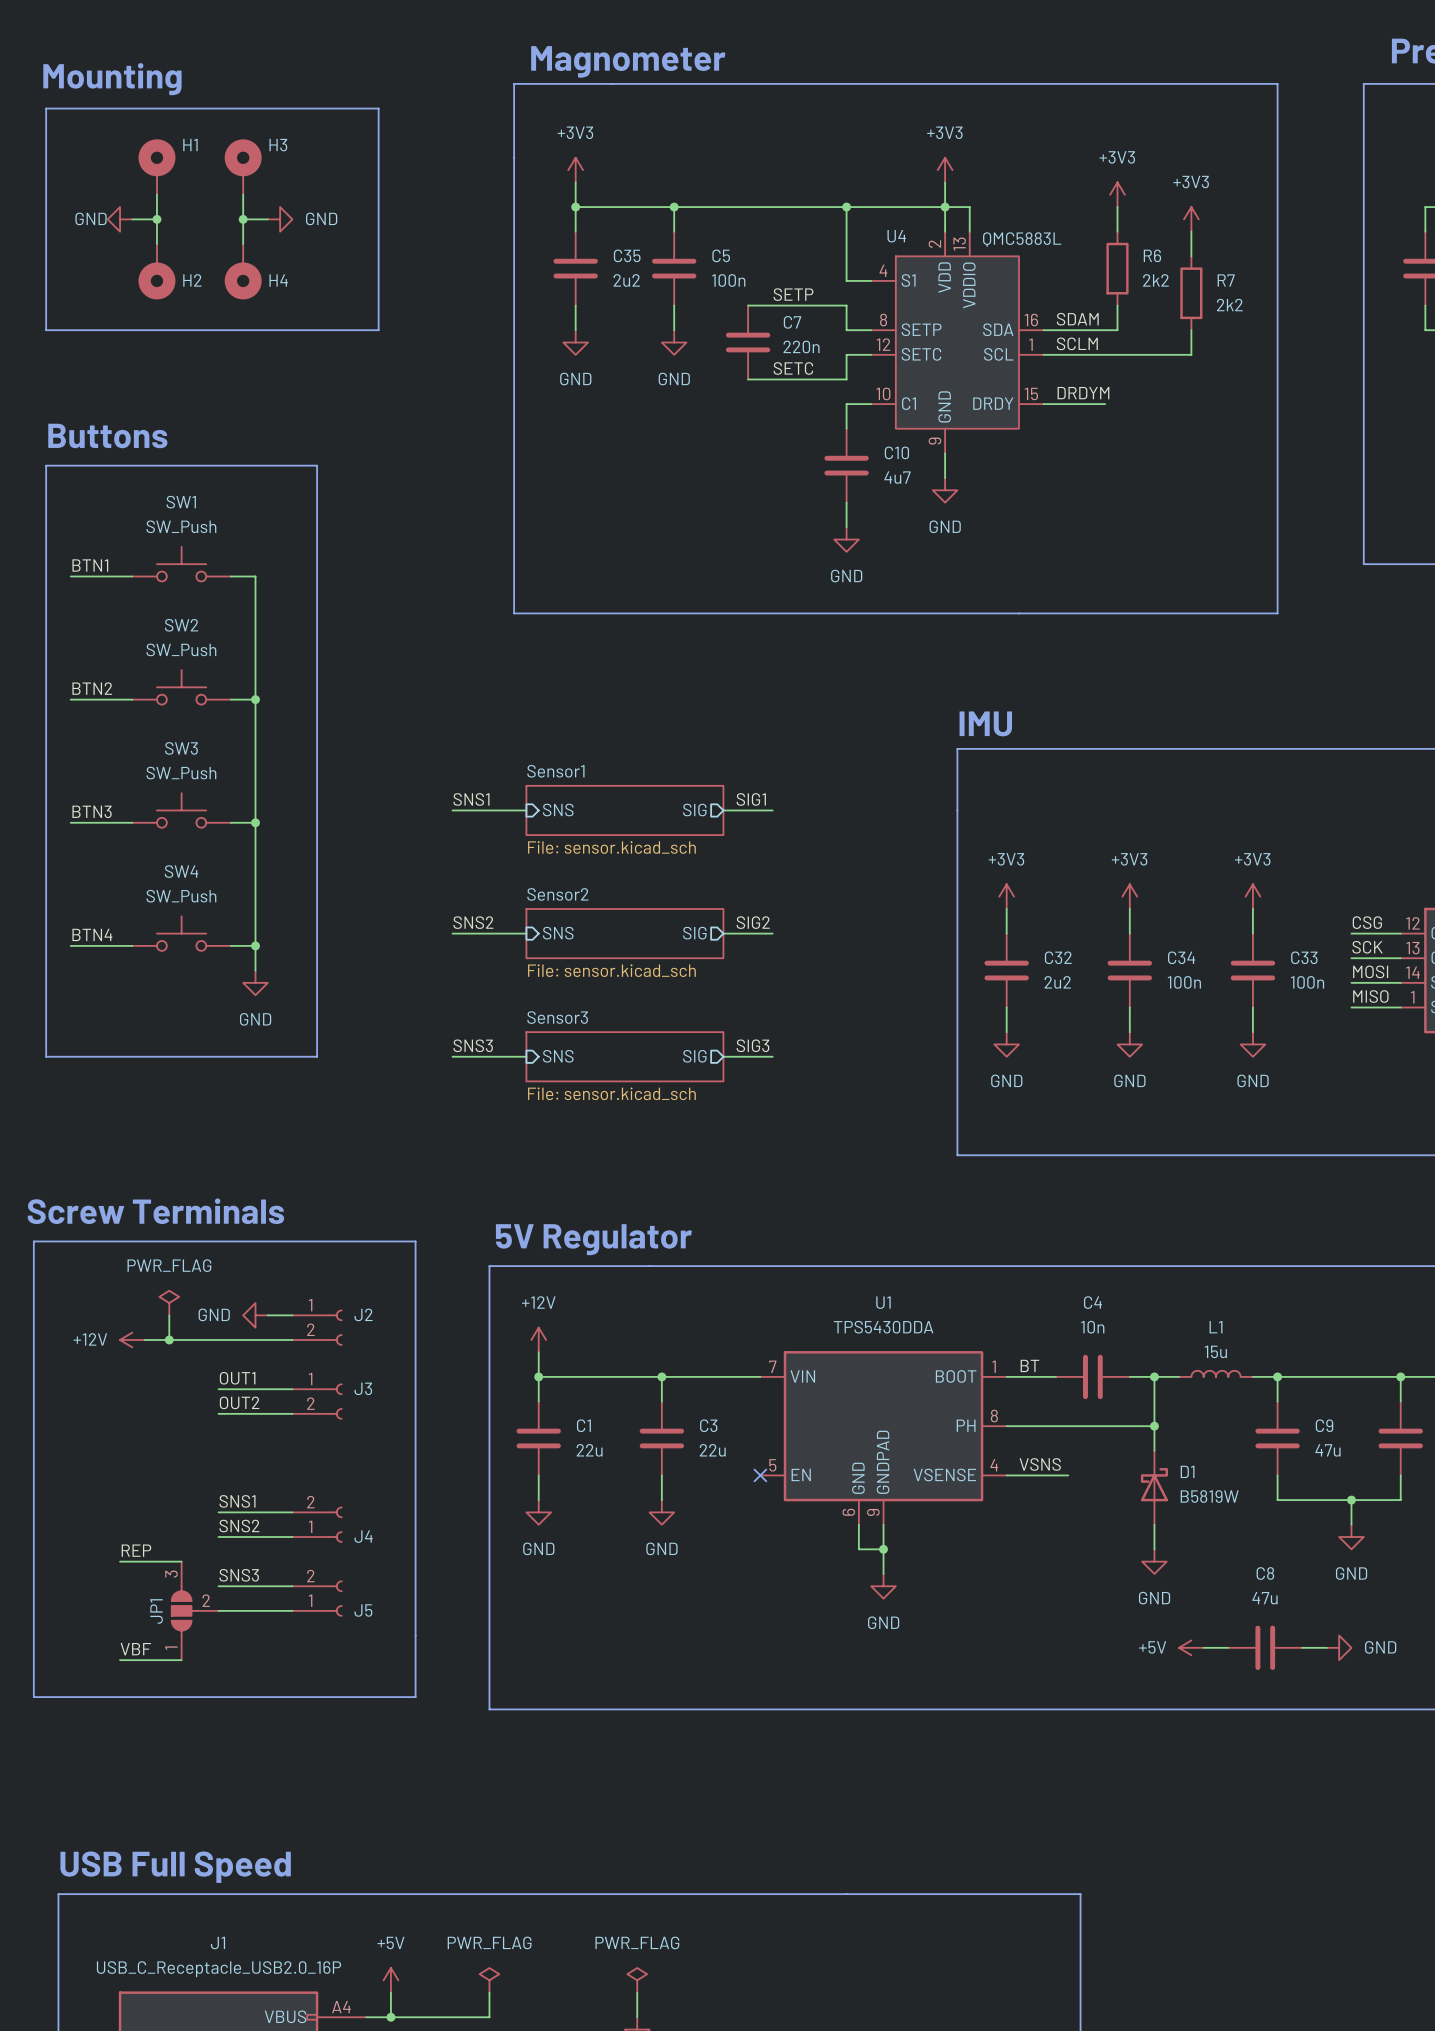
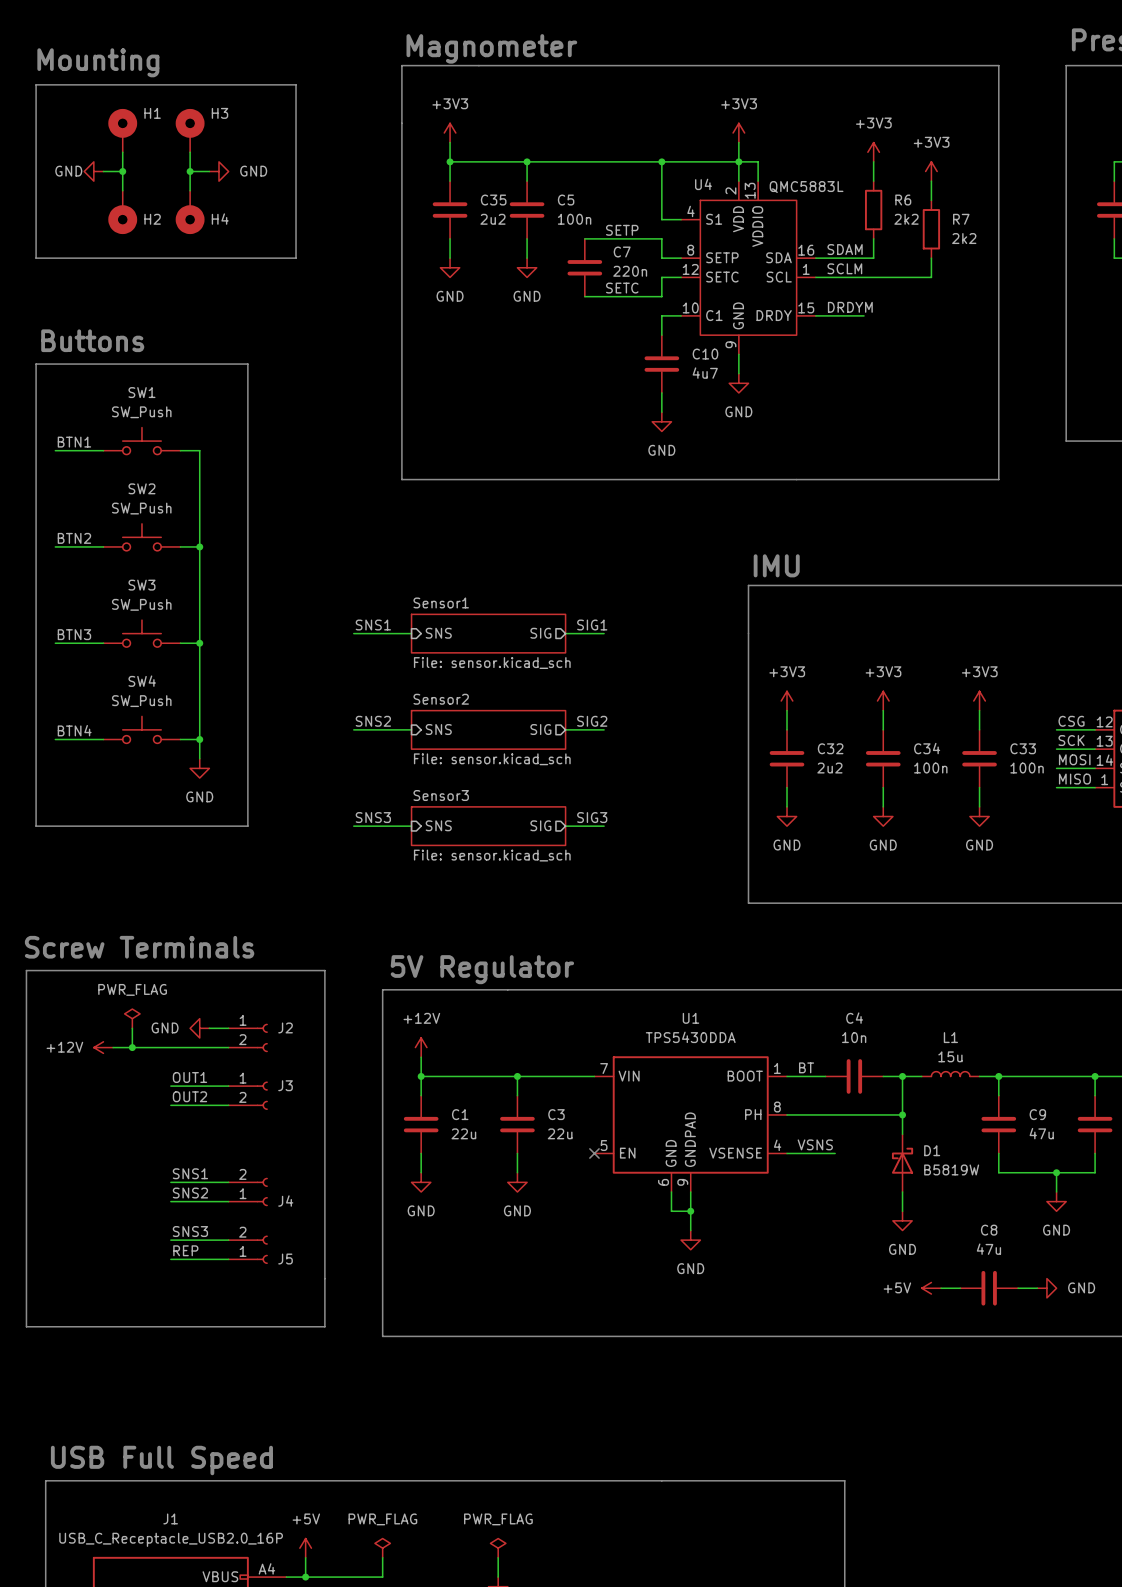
label position: REP (136, 1550) -> REP (185, 1250)
wire: (120, 1561) (181, 1561) -> none
JP1: (195, 1610) -> none
label: VBF (135, 1649) -> none
wire: (120, 1660) (181, 1660) -> none

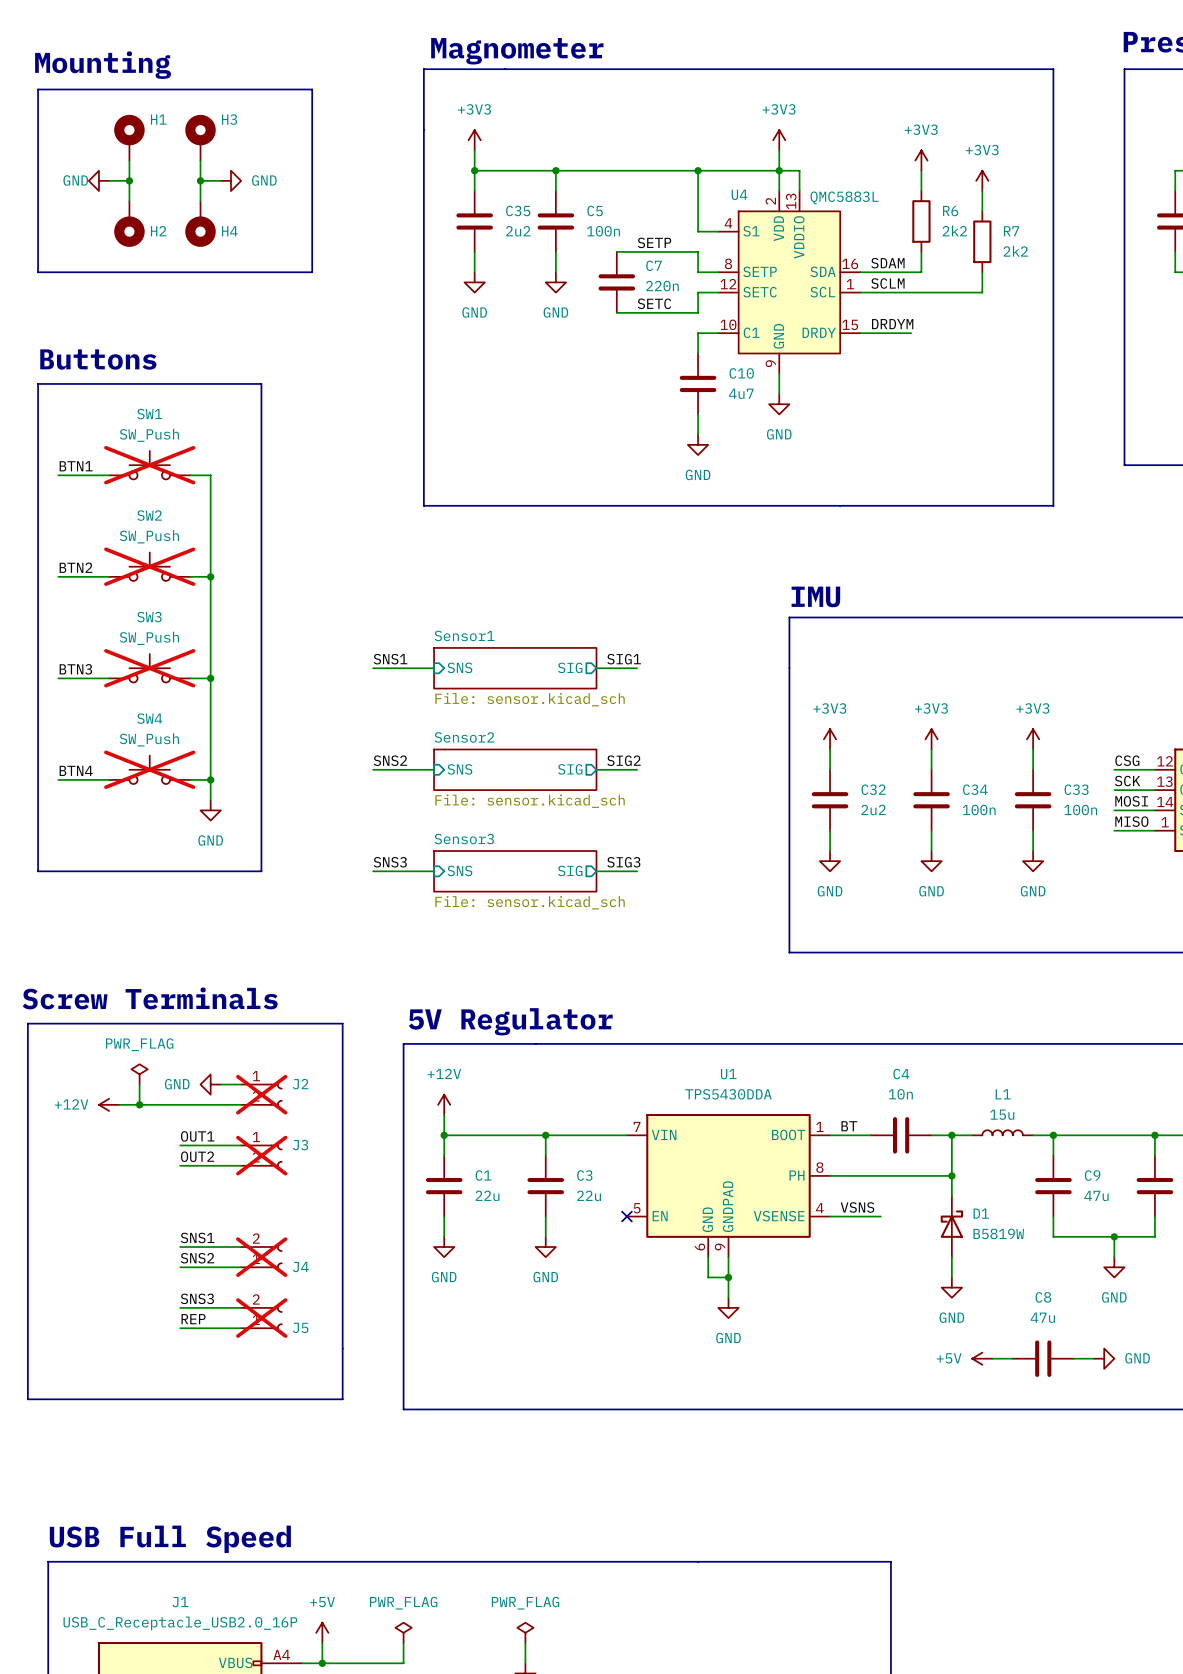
SW1 do-not-place cross: none -> (149, 465)
SW2 do-not-place cross: none -> (149, 566)
SW3 do-not-place cross: none -> (149, 668)
SW4 do-not-place cross: none -> (149, 769)
J2 do-not-place cross: none -> (261, 1094)
J3 do-not-place cross: none -> (261, 1155)
J4 do-not-place cross: none -> (261, 1257)
J5 do-not-place cross: none -> (261, 1318)

